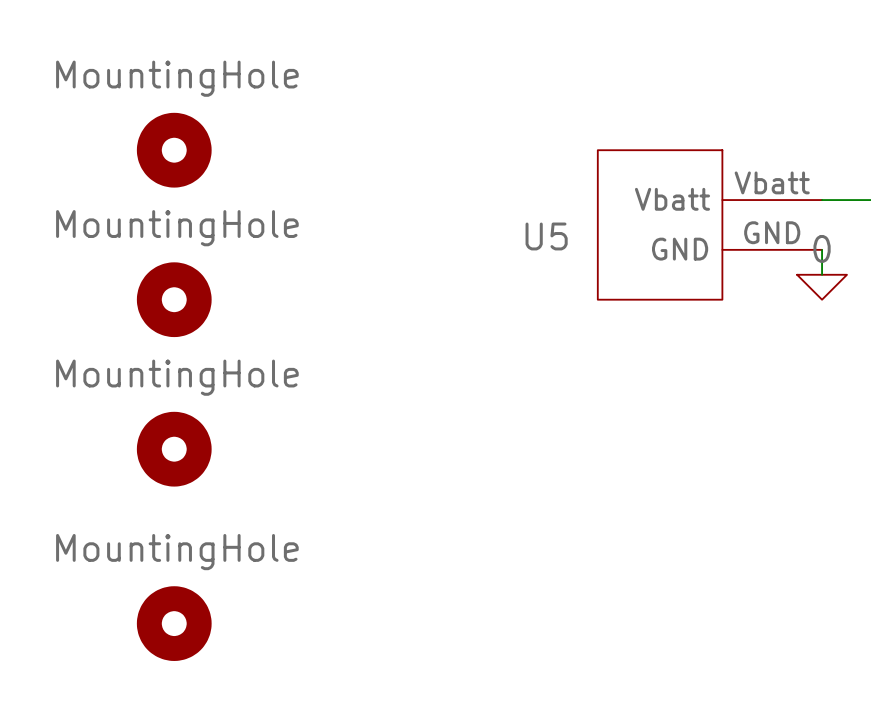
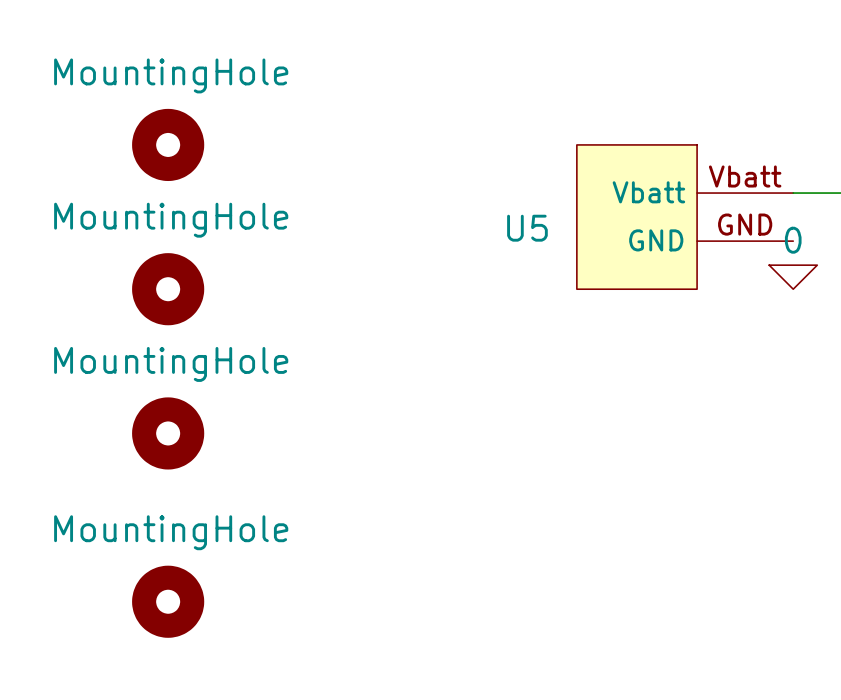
wire: (822, 249) (822, 274) -> none

